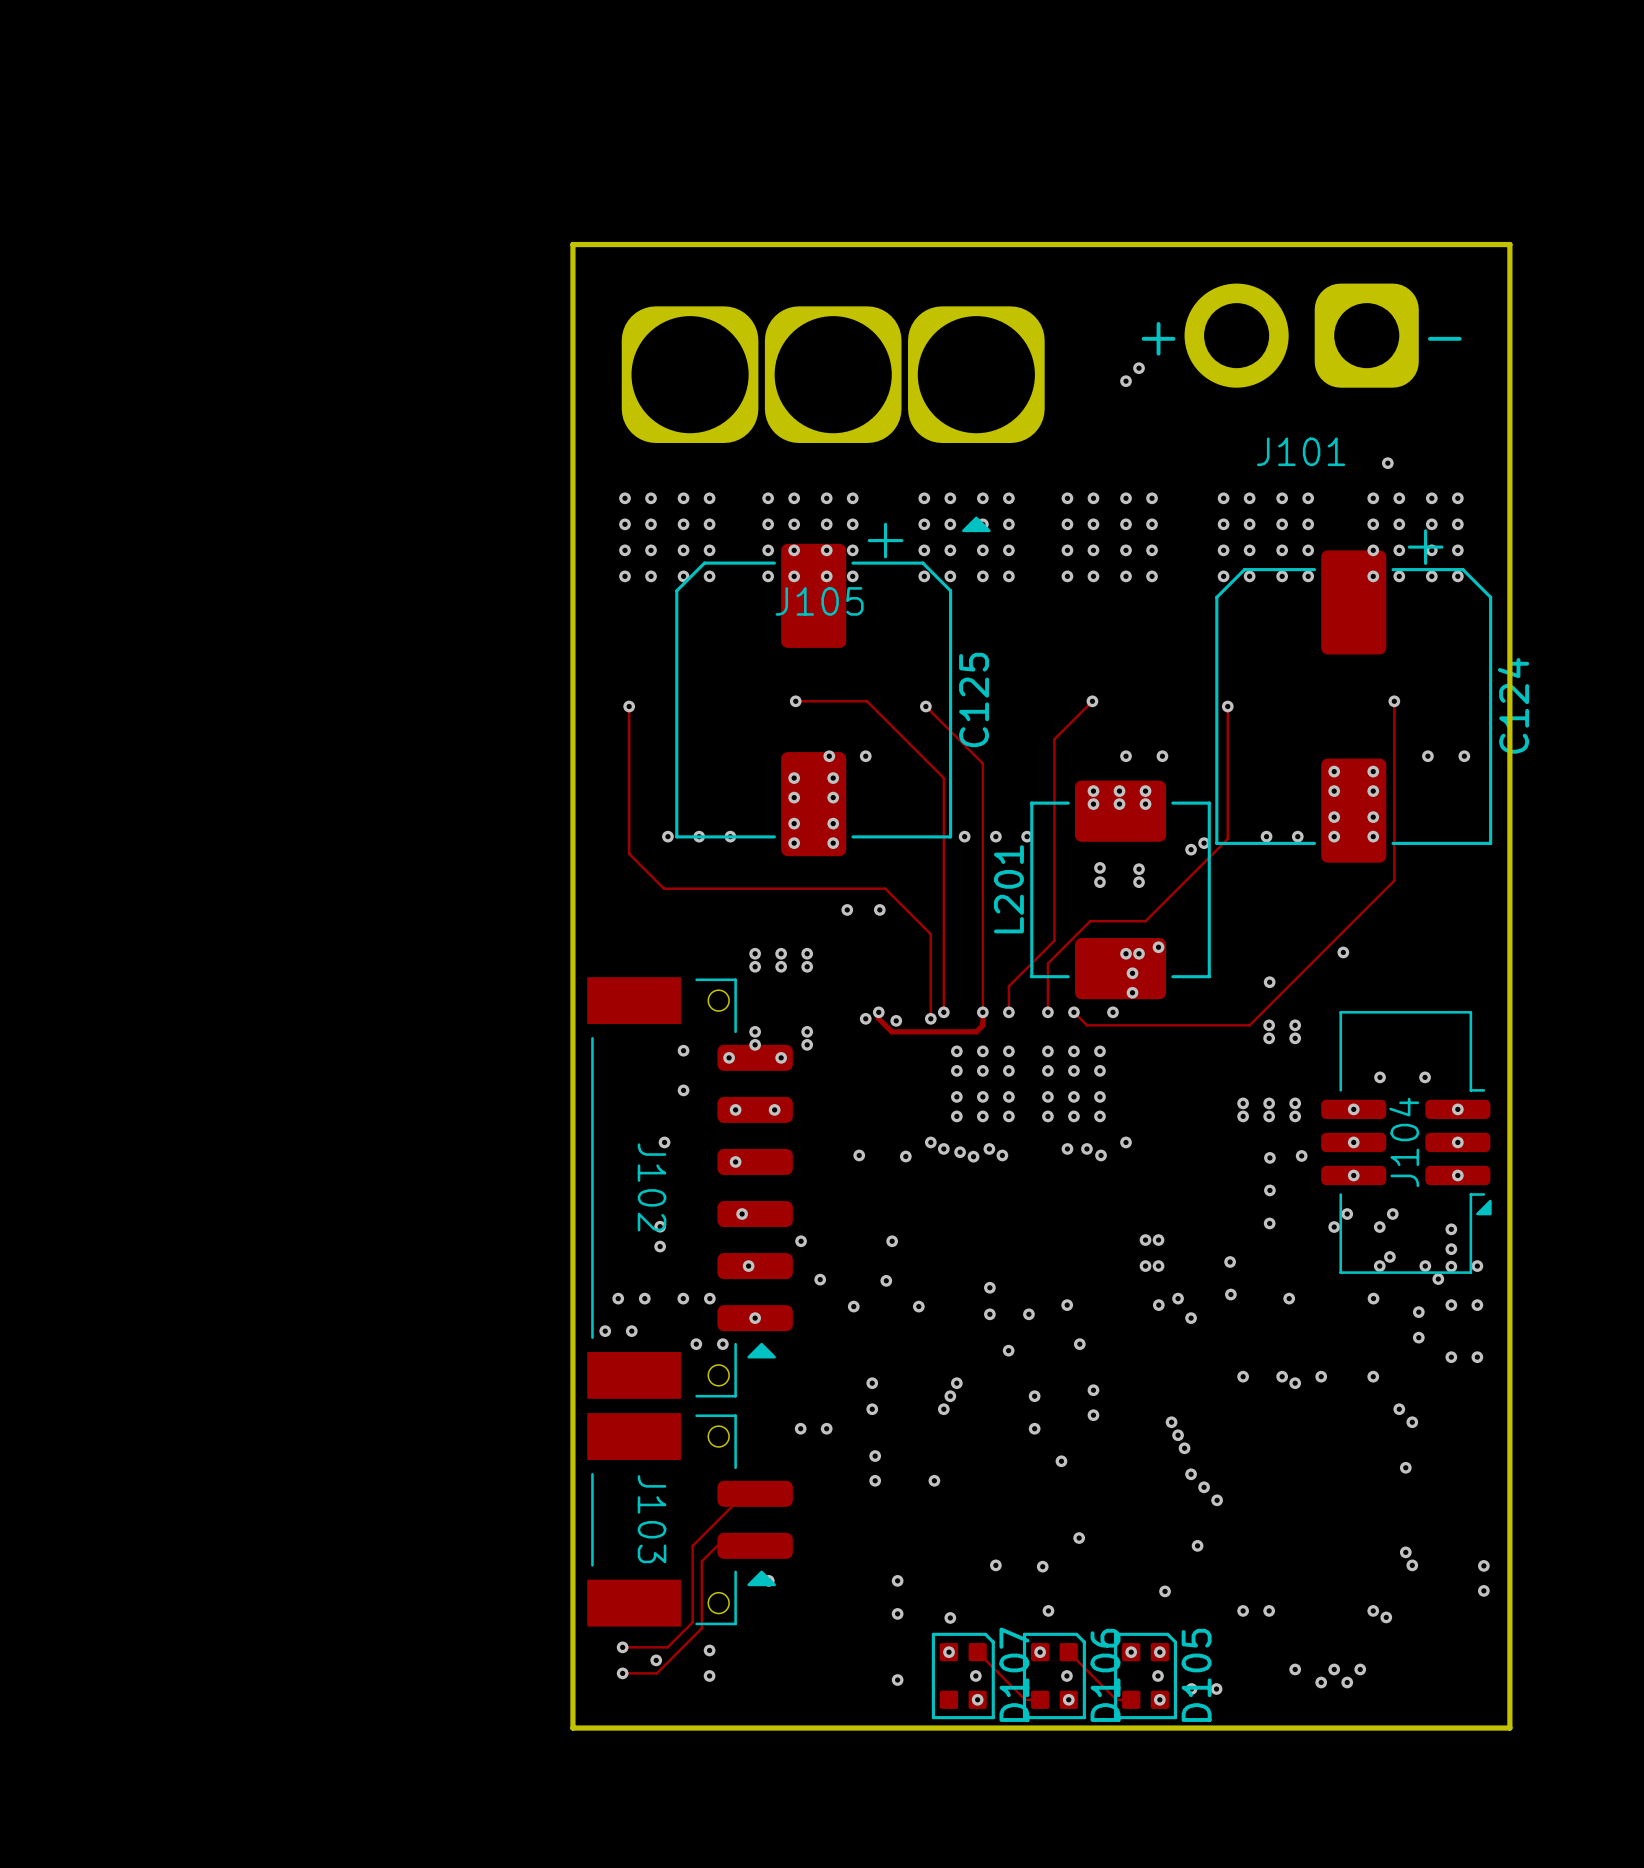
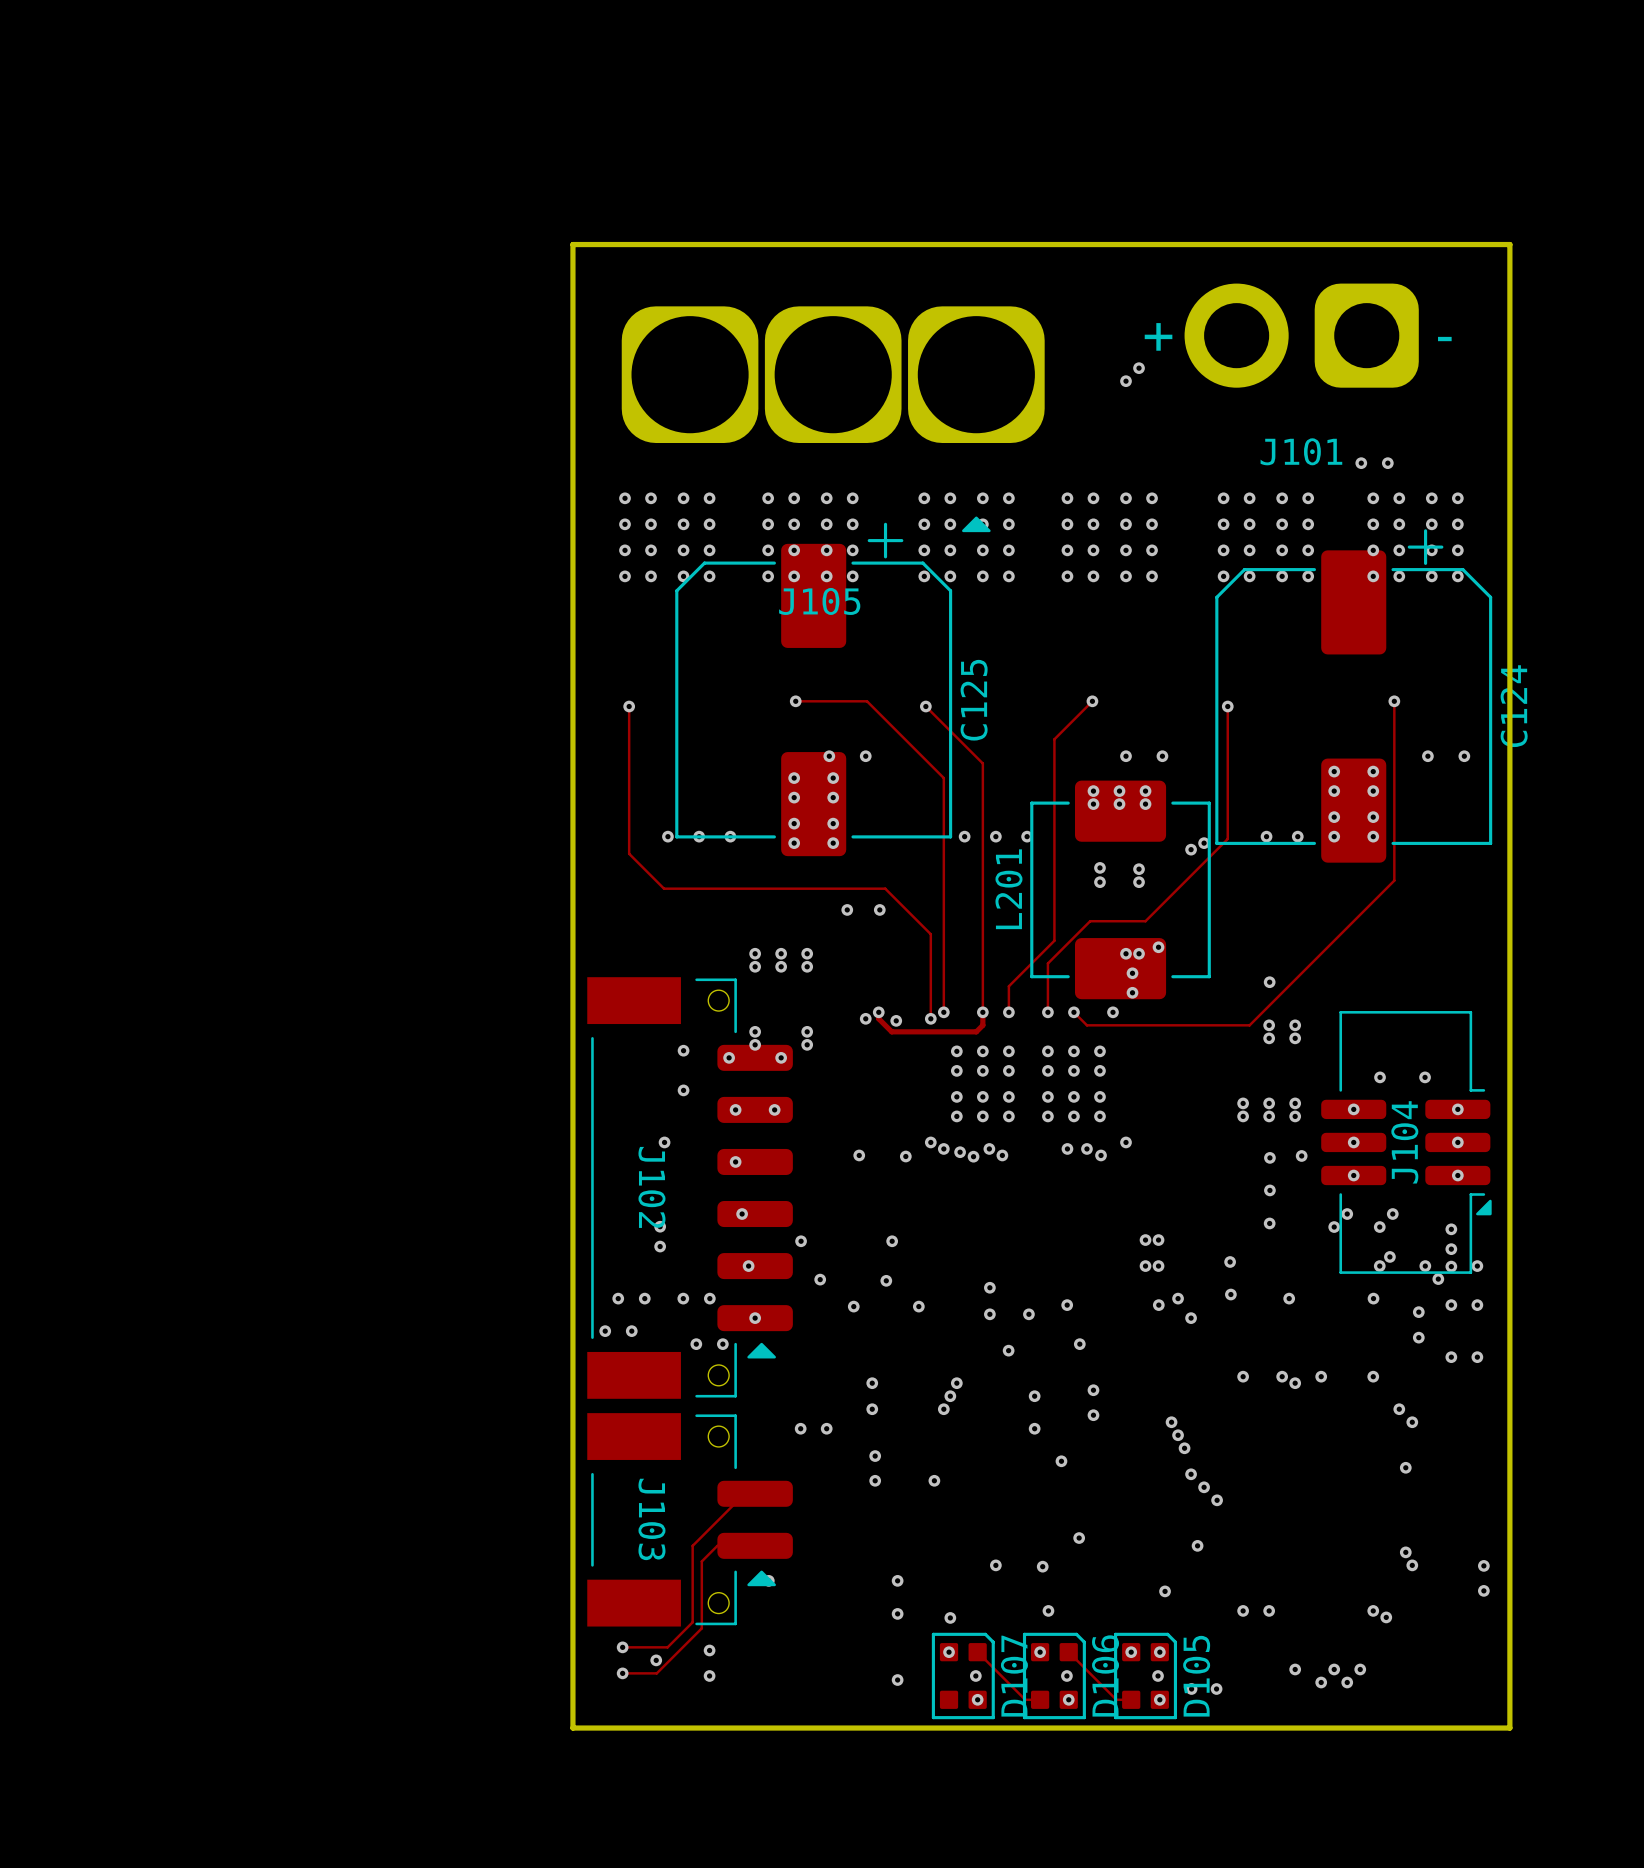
via: none -> (1361, 463)
via: (1343, 952) -> none

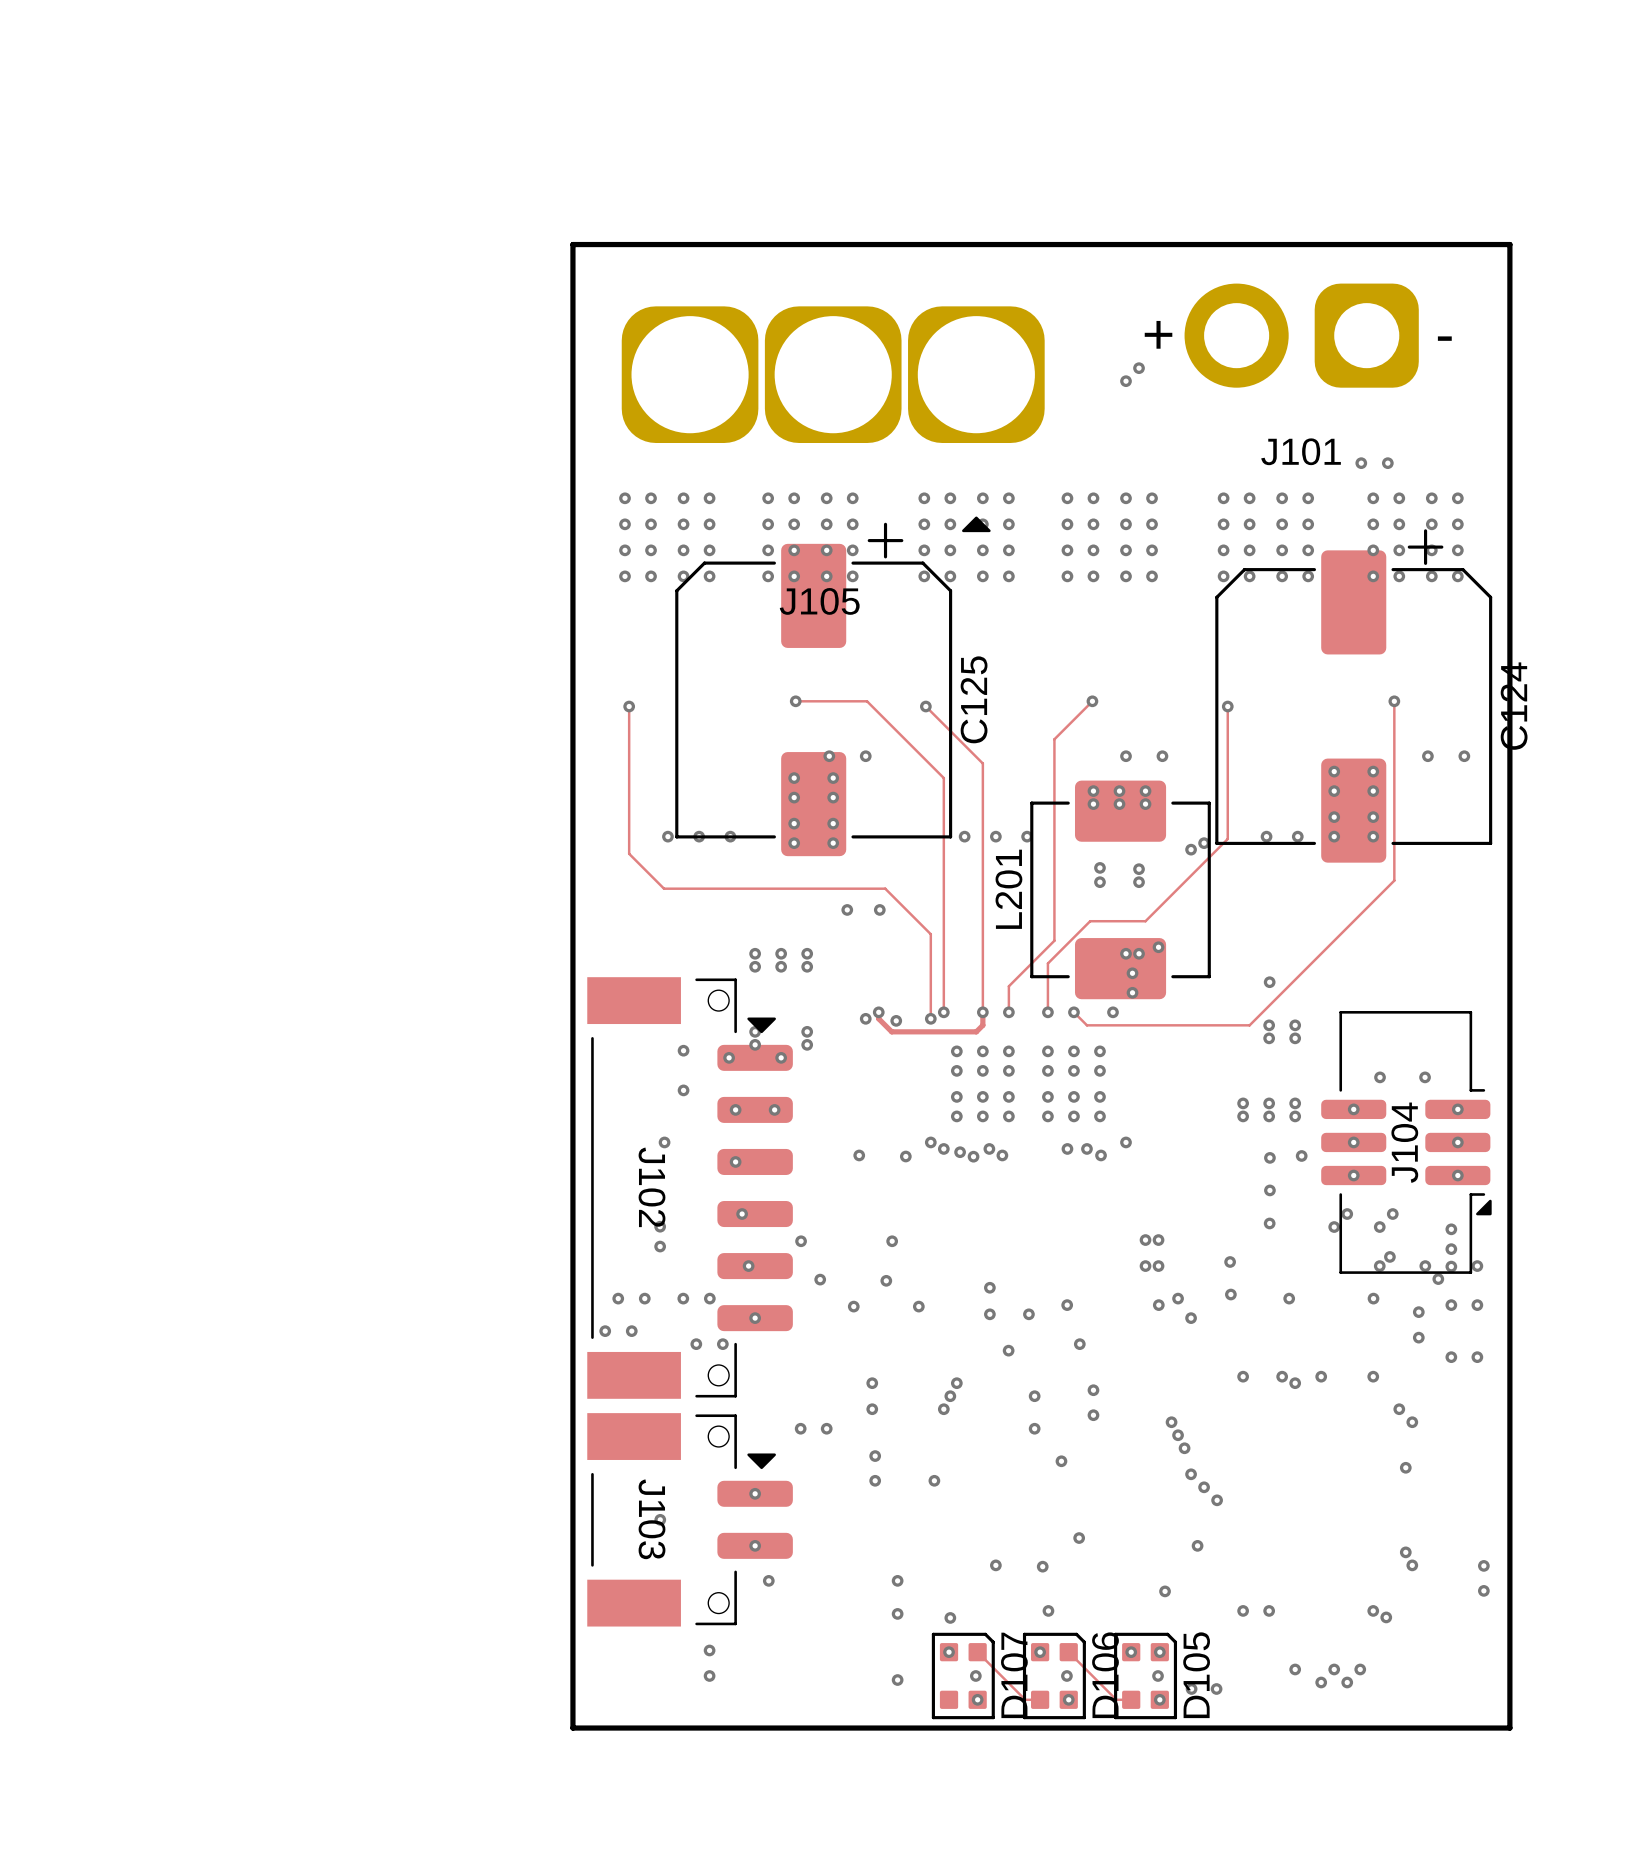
J102 footprint: [587, 977, 793, 1399] -> [587, 977, 793, 1399]
J103 footprint: [587, 1413, 793, 1627] -> [587, 1413, 793, 1627]
track: (755, 1493) (744, 1493) (692, 1545) (692, 1622) (667, 1647) (622, 1647) -> none
via: none -> (755, 1493)
via: none -> (660, 1519)
track: (755, 1545) (717, 1545) (701, 1561) (701, 1628) (656, 1673) (622, 1673) -> none
via: none -> (755, 1545)
via: (622, 1647) -> none
via: (656, 1660) -> none
via: (622, 1673) -> none

